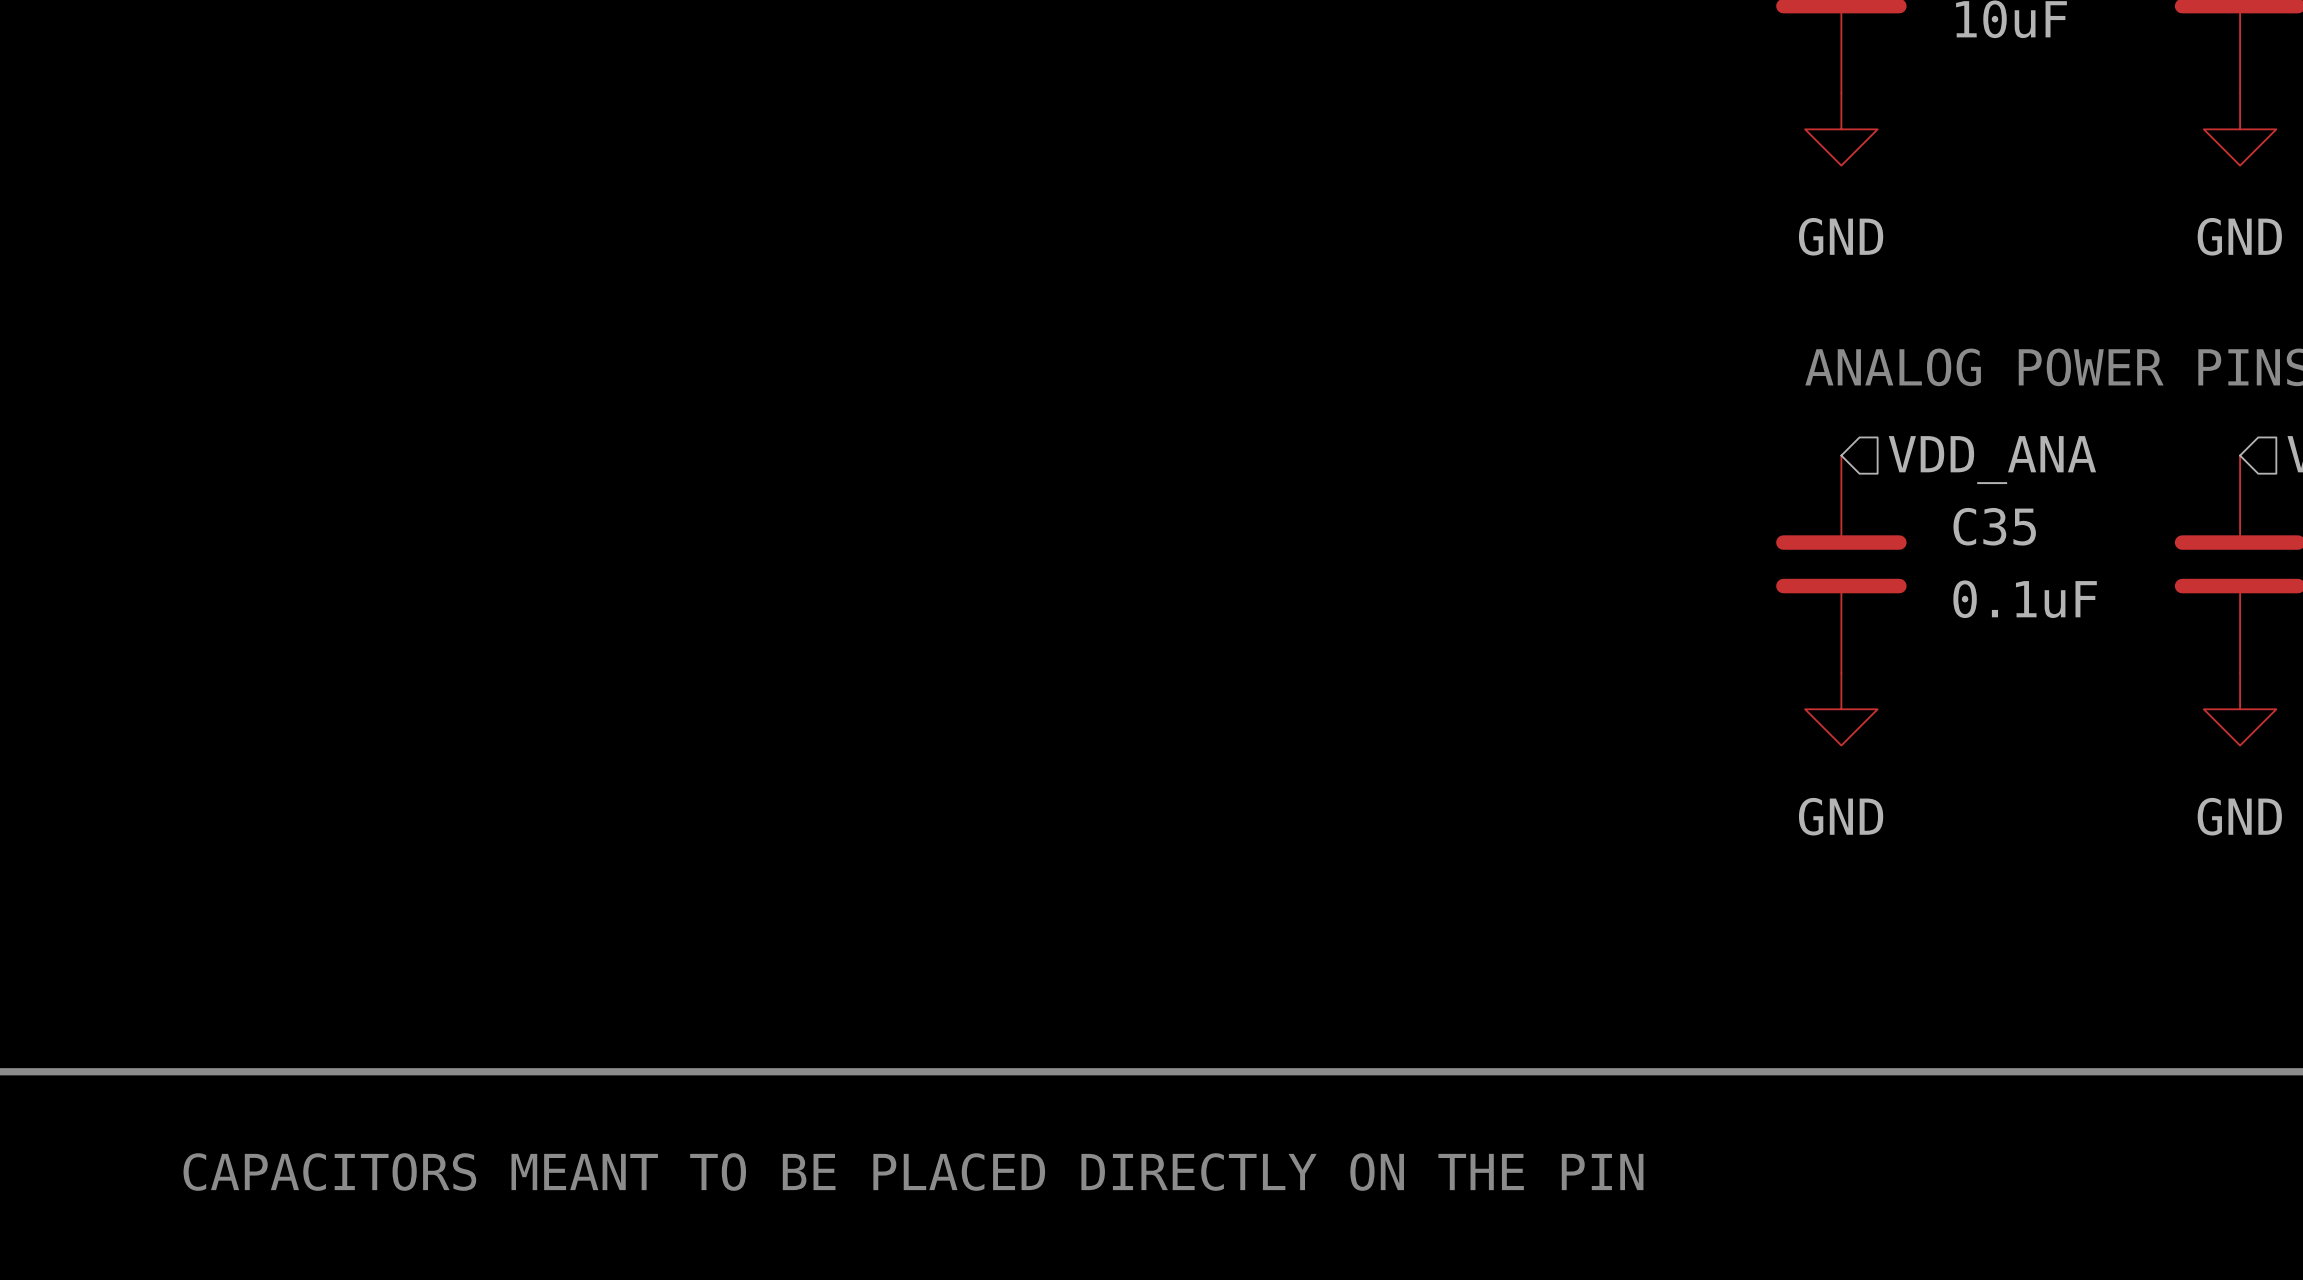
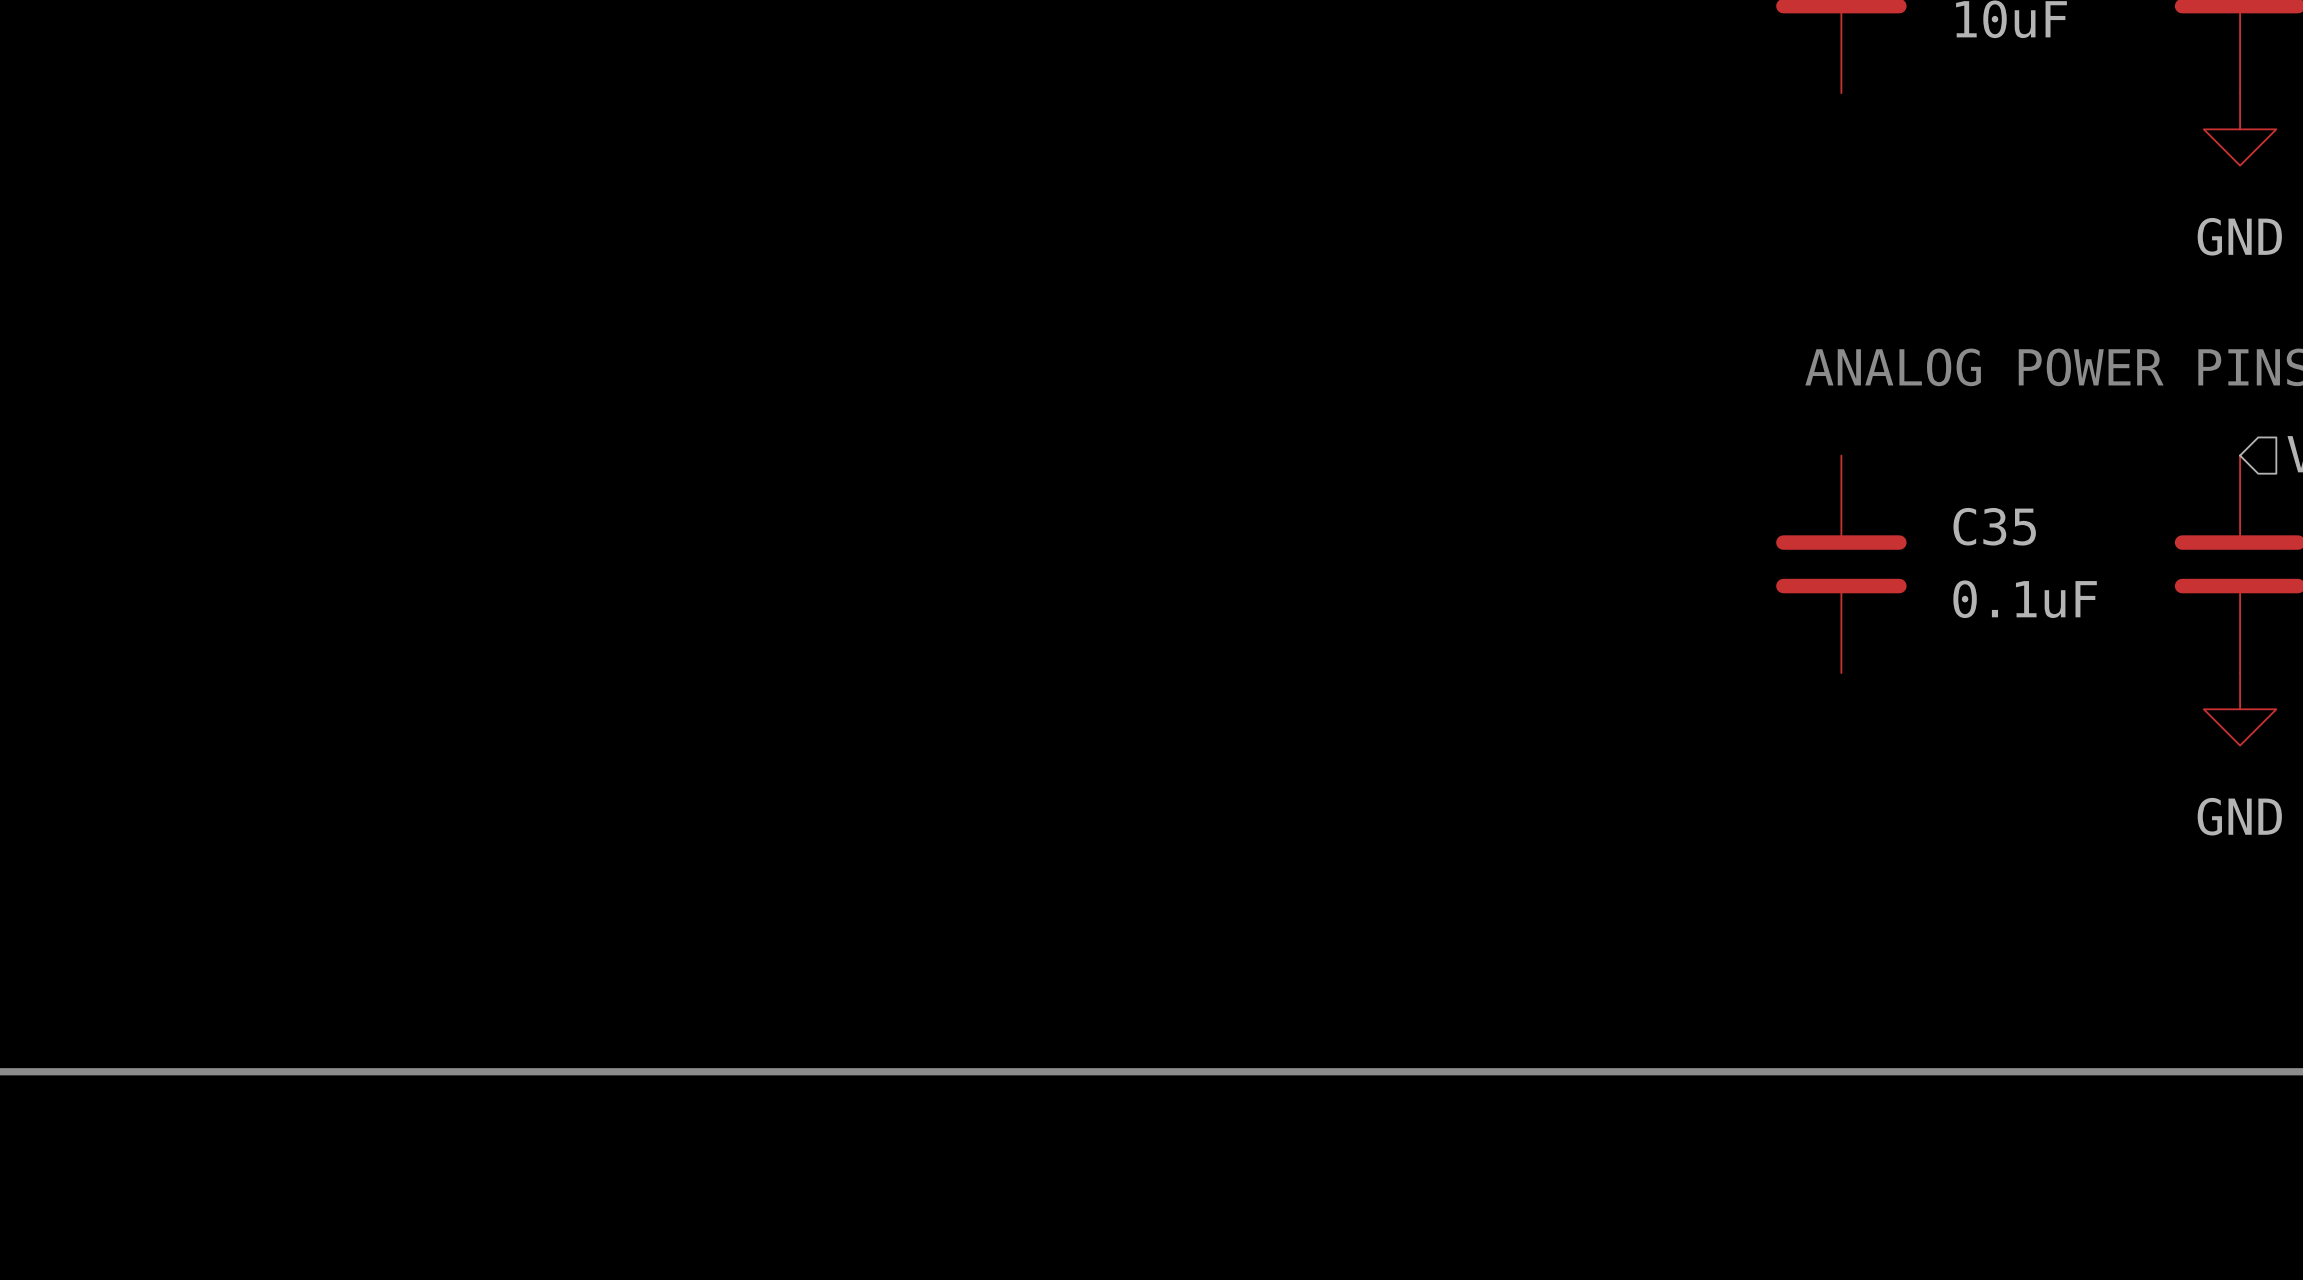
power symbol: GND (1841, 129) -> none
hierarchical label: VDD_ANA (1992, 460) -> none
power symbol: GND (1841, 709) -> none
text: CAPACITORS MEANT TO BE PLACED DIRECTLY ON THE PIN (913, 1172) -> none

